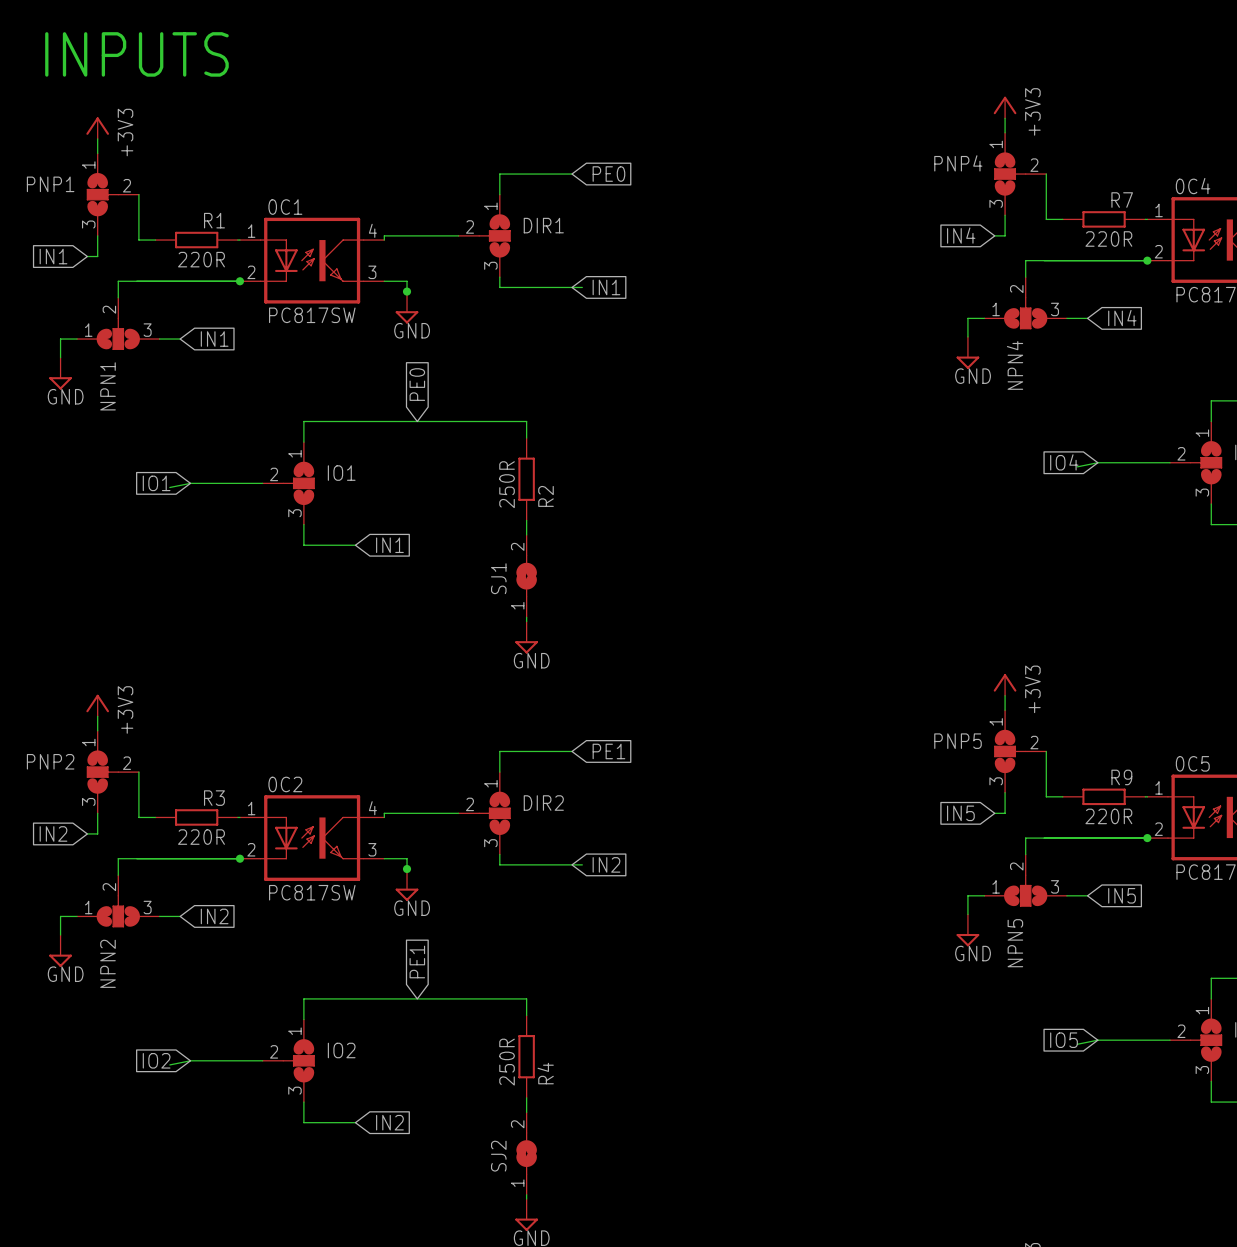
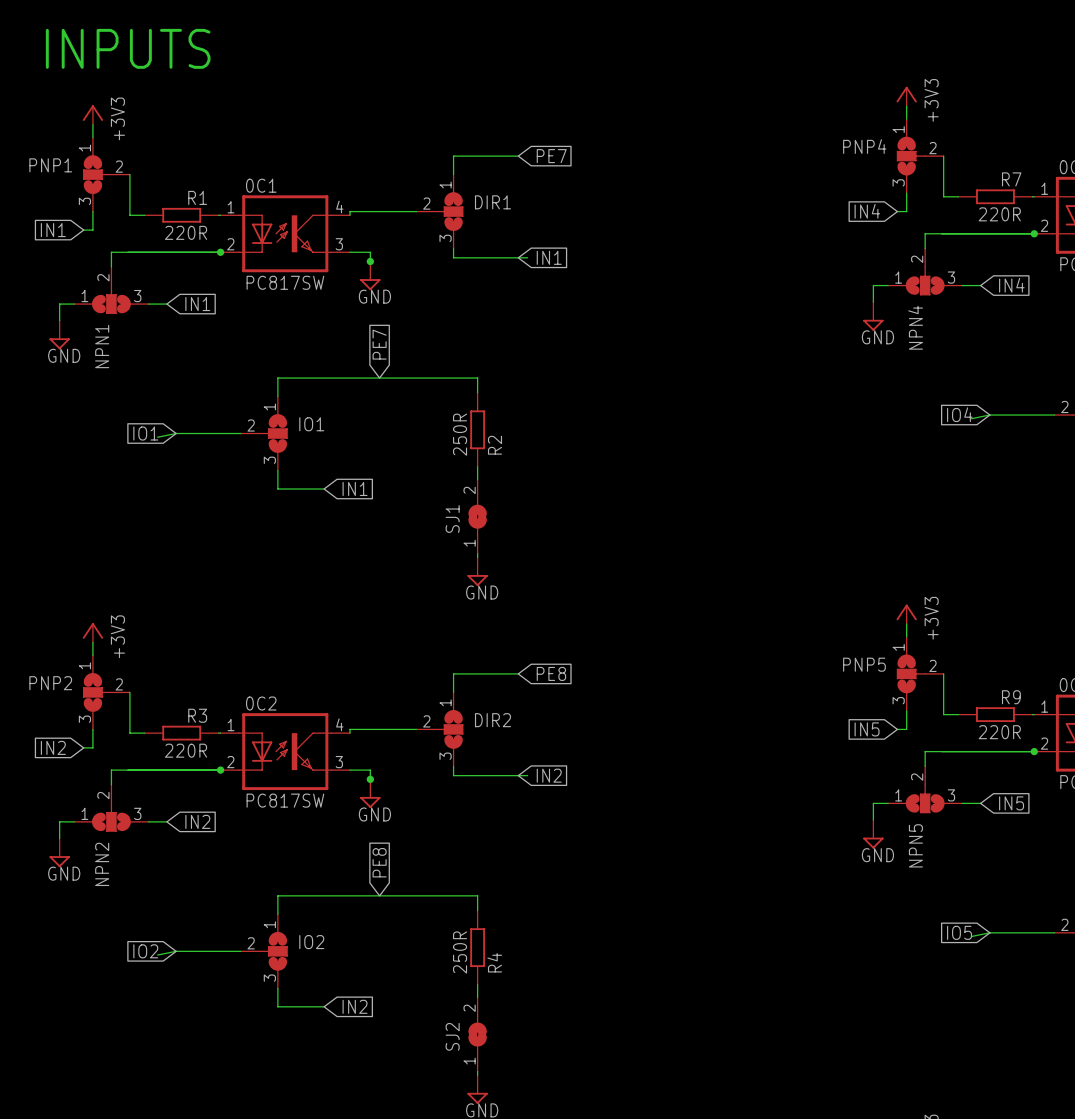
global label: PE0 (608, 174) -> PE7 (551, 156)
global label: PE0 (417, 384) -> PE7 (379, 344)
global label: PE1 (608, 751) -> PE8 (551, 673)
global label: PE1 (417, 961) -> PE8 (379, 862)

